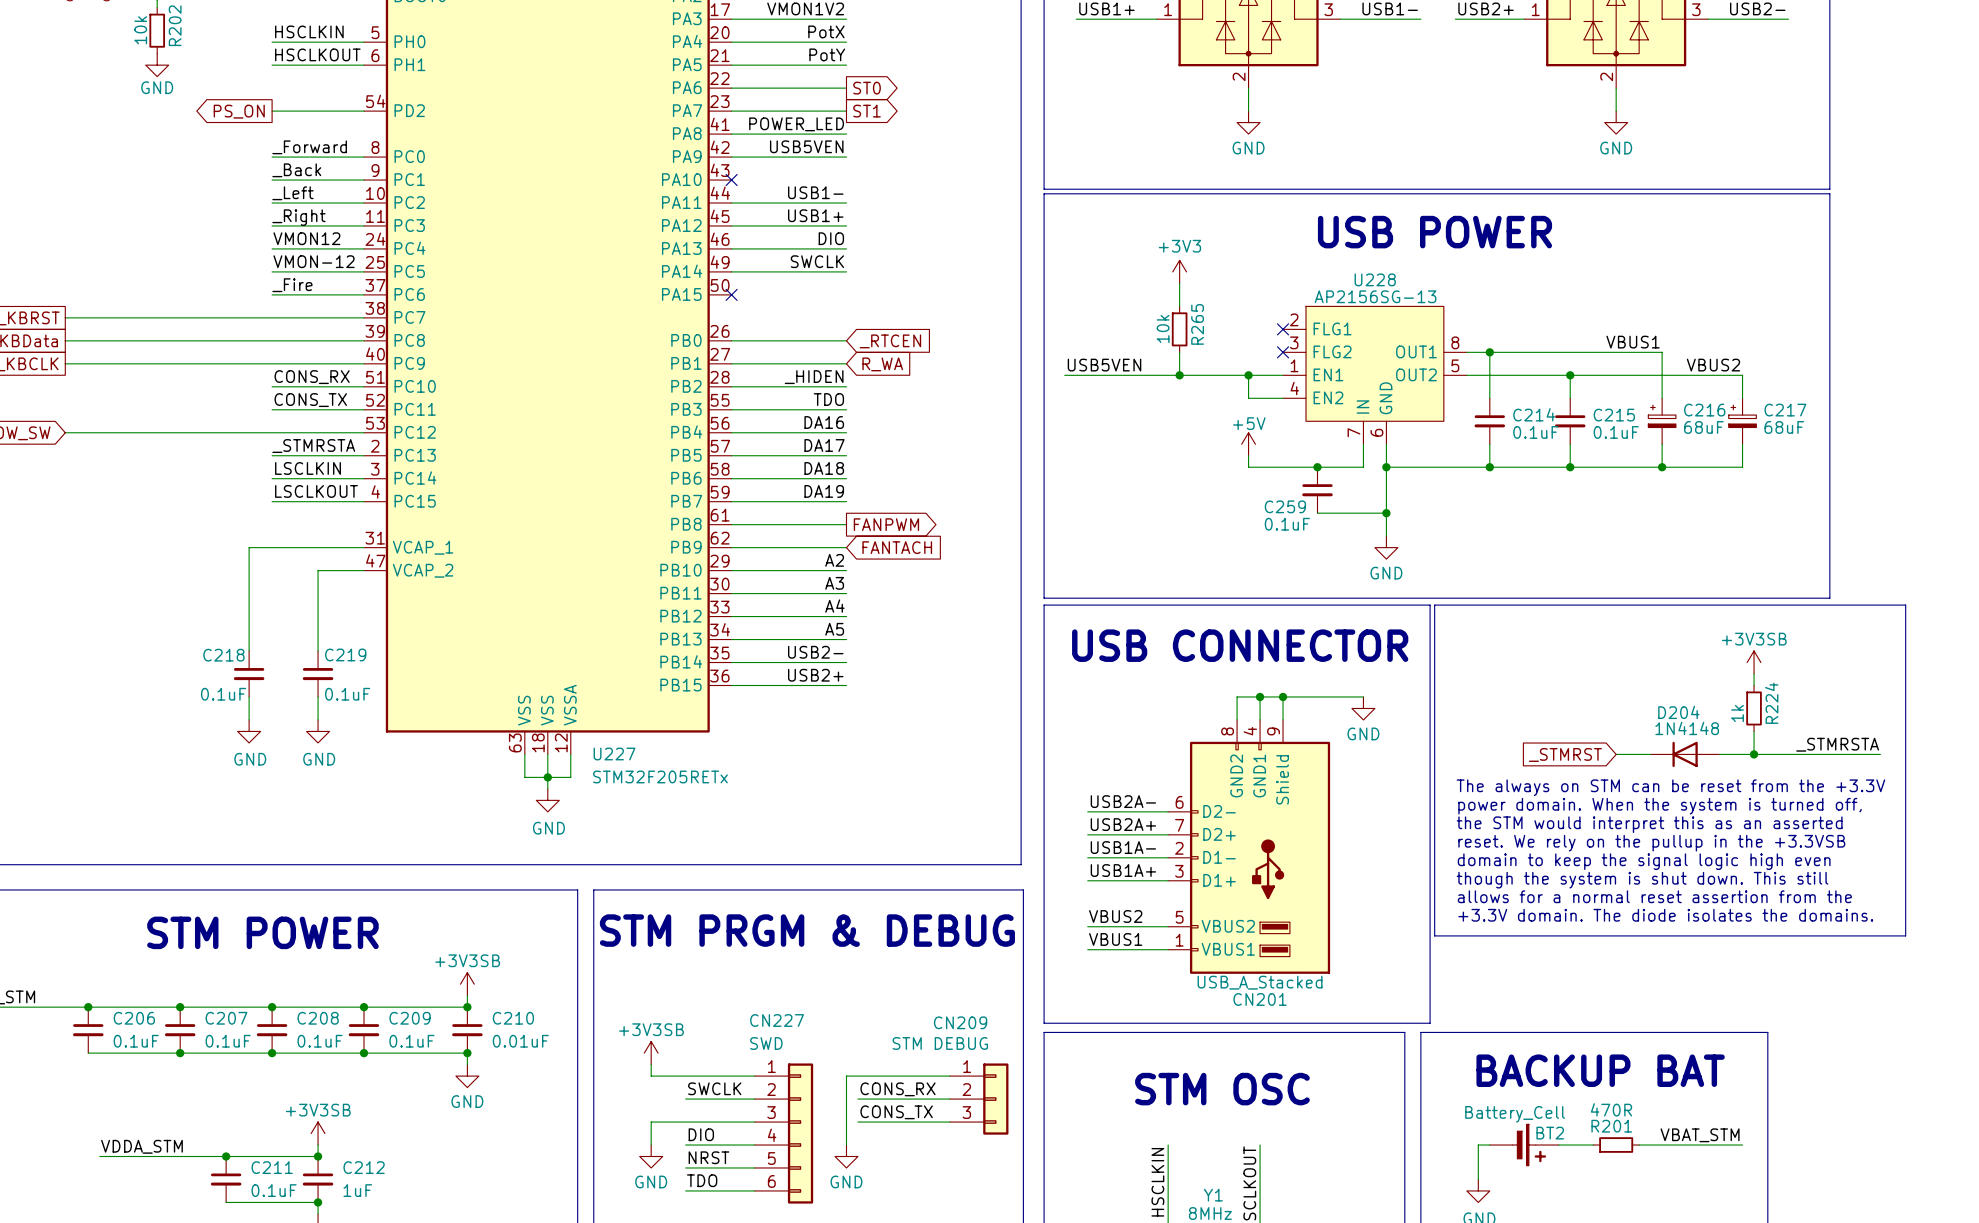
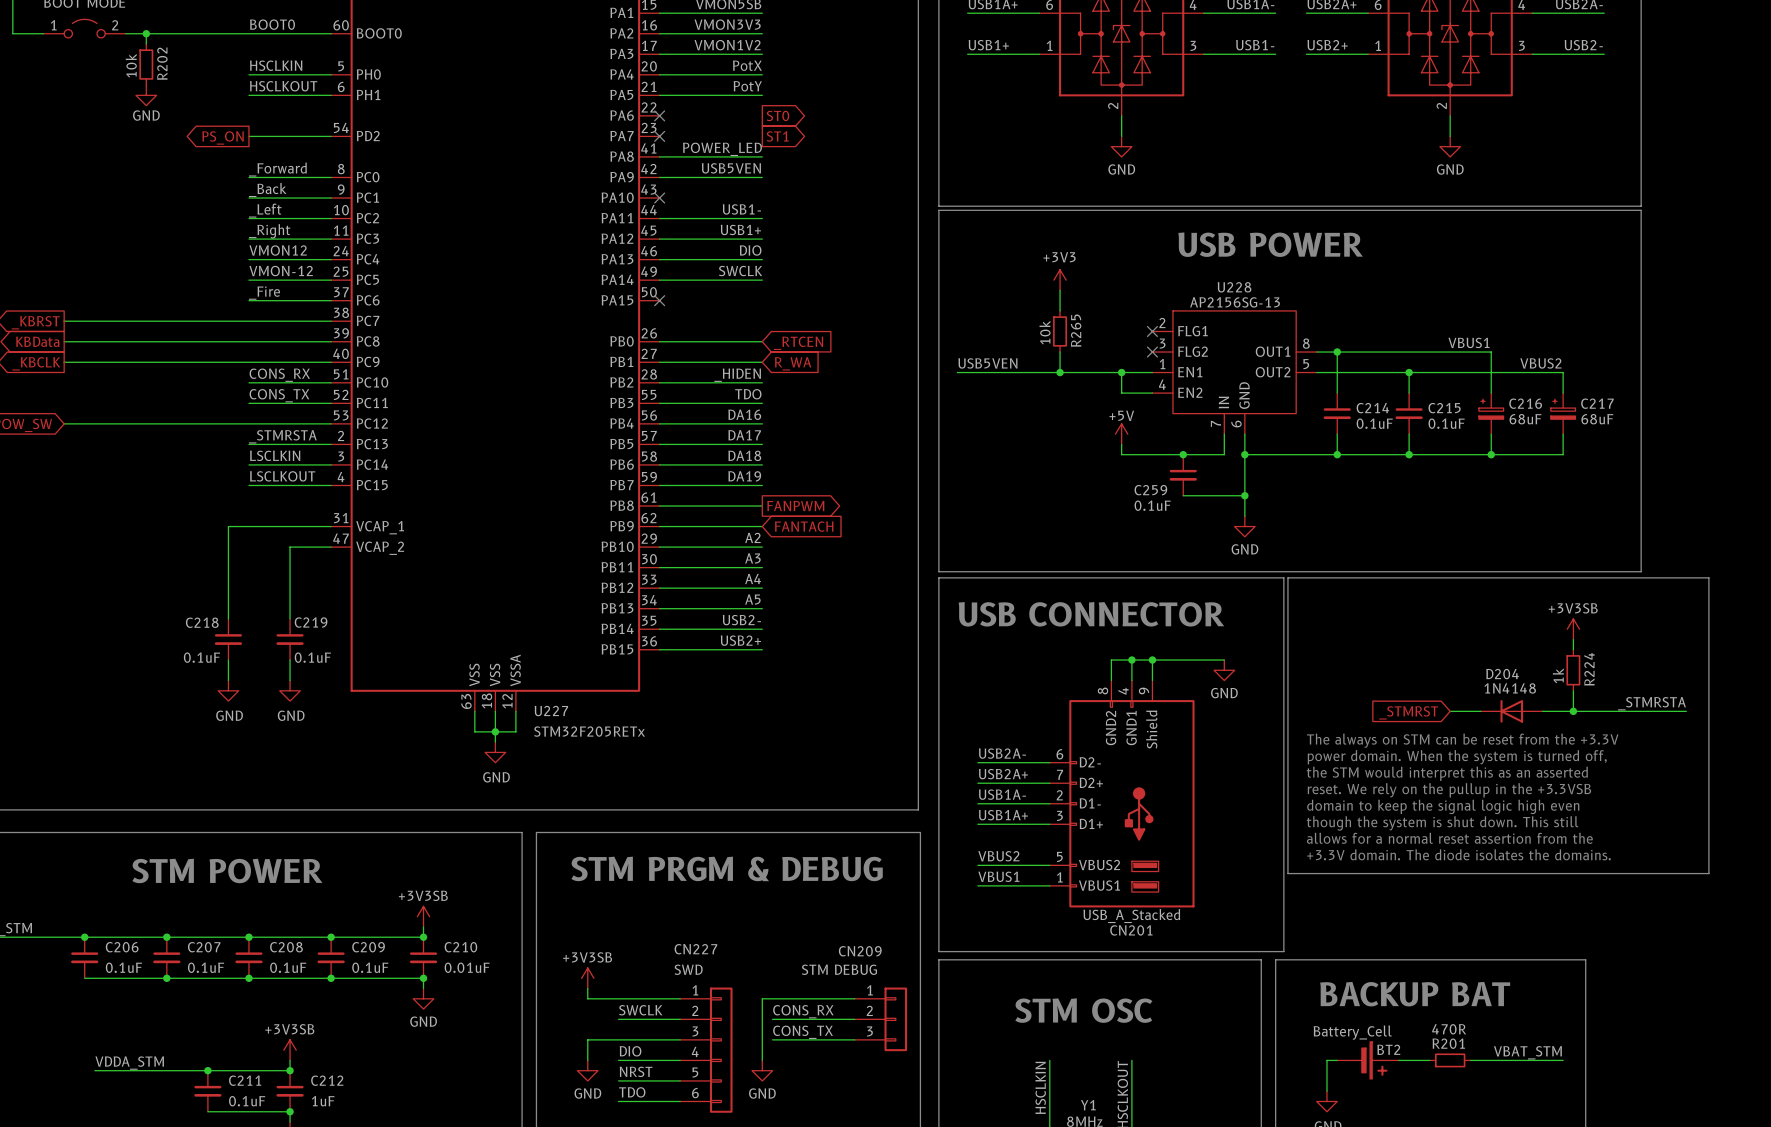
wire: (731, 88) (846, 88) -> none
no-connect mark: none -> (659, 115)
wire: (731, 111) (846, 111) -> none
no-connect mark: none -> (659, 136)

